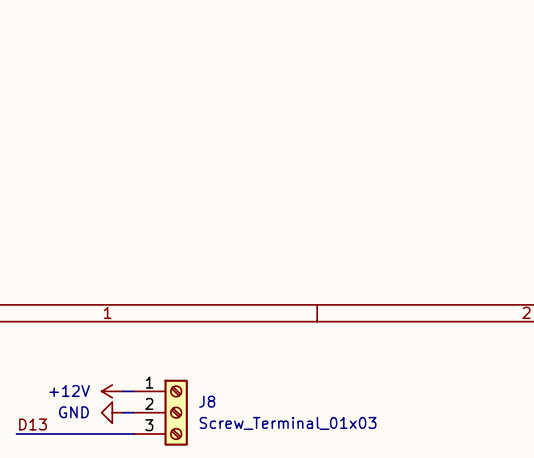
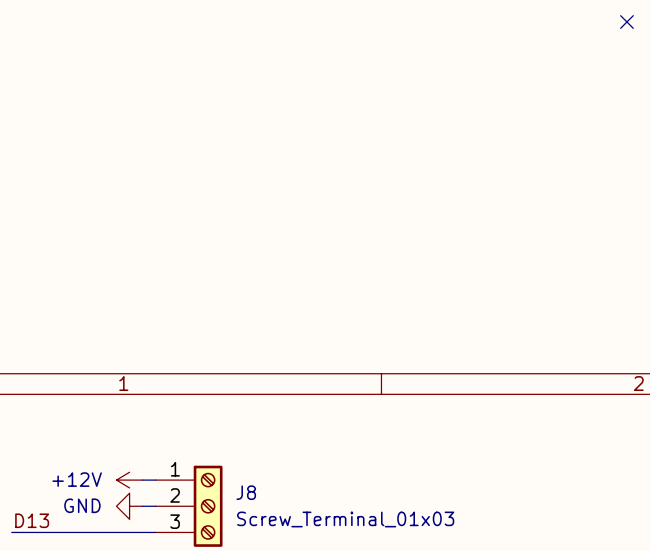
no-connect mark: none -> (626, 21)

